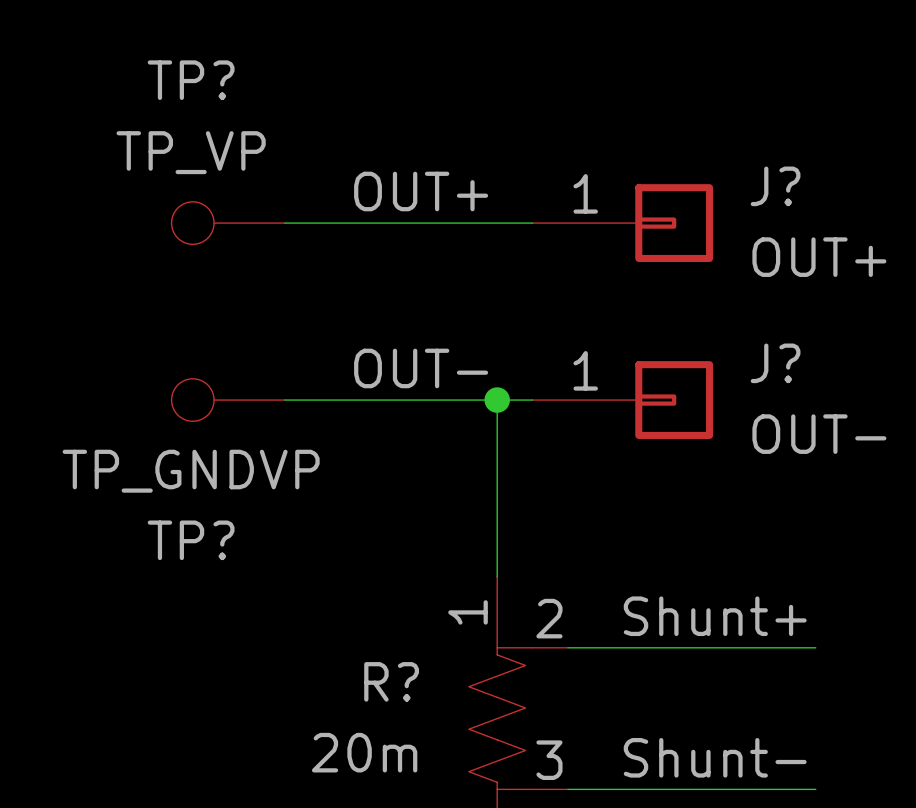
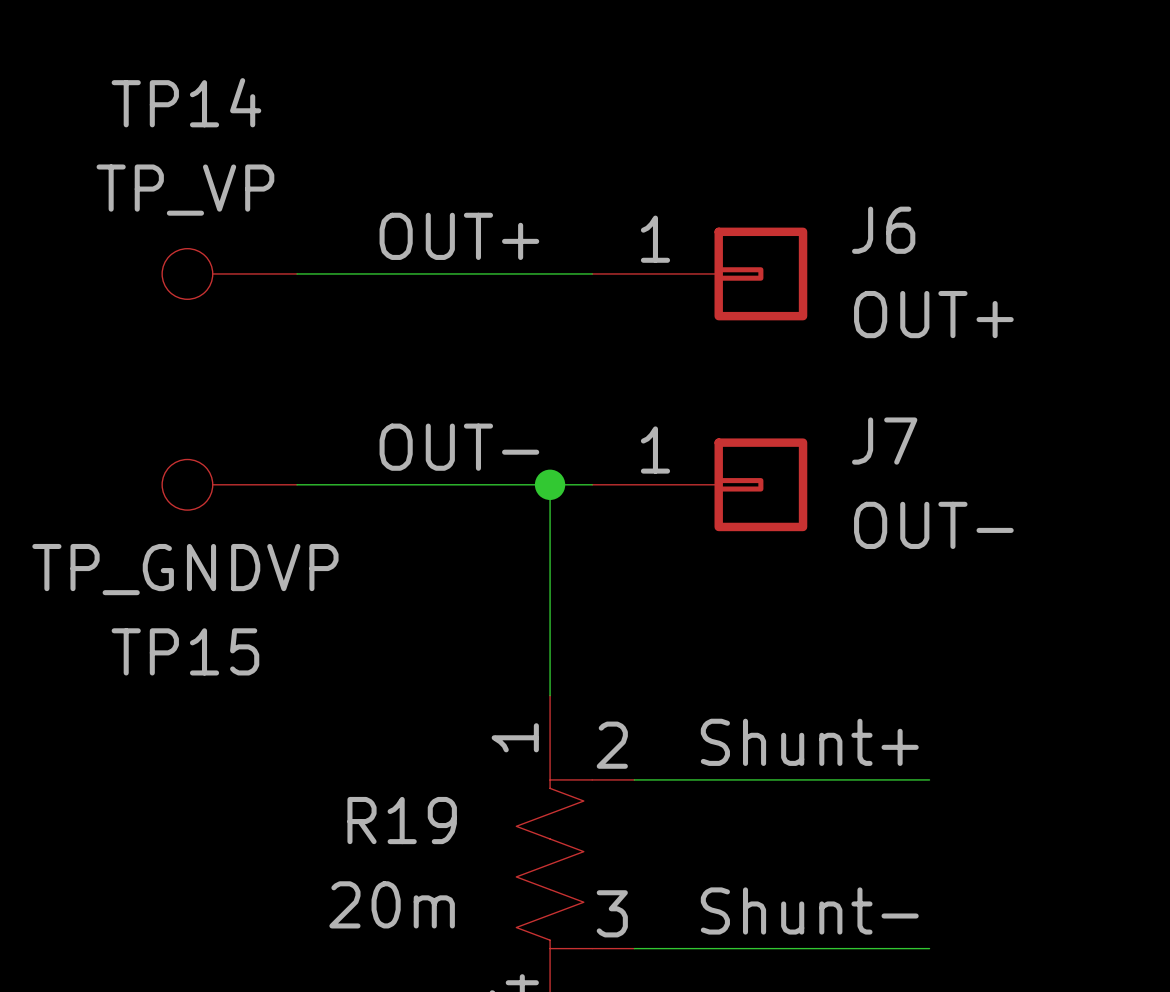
TP? name: TP? (191, 80) -> TP14 (186, 102)
J? name: J? (775, 186) -> J6 (883, 230)
J? name: J? (775, 363) -> J7 (884, 441)
TP? name: TP? (191, 540) -> TP15 (185, 651)
R? name: R? (391, 681) -> R19 (402, 820)

